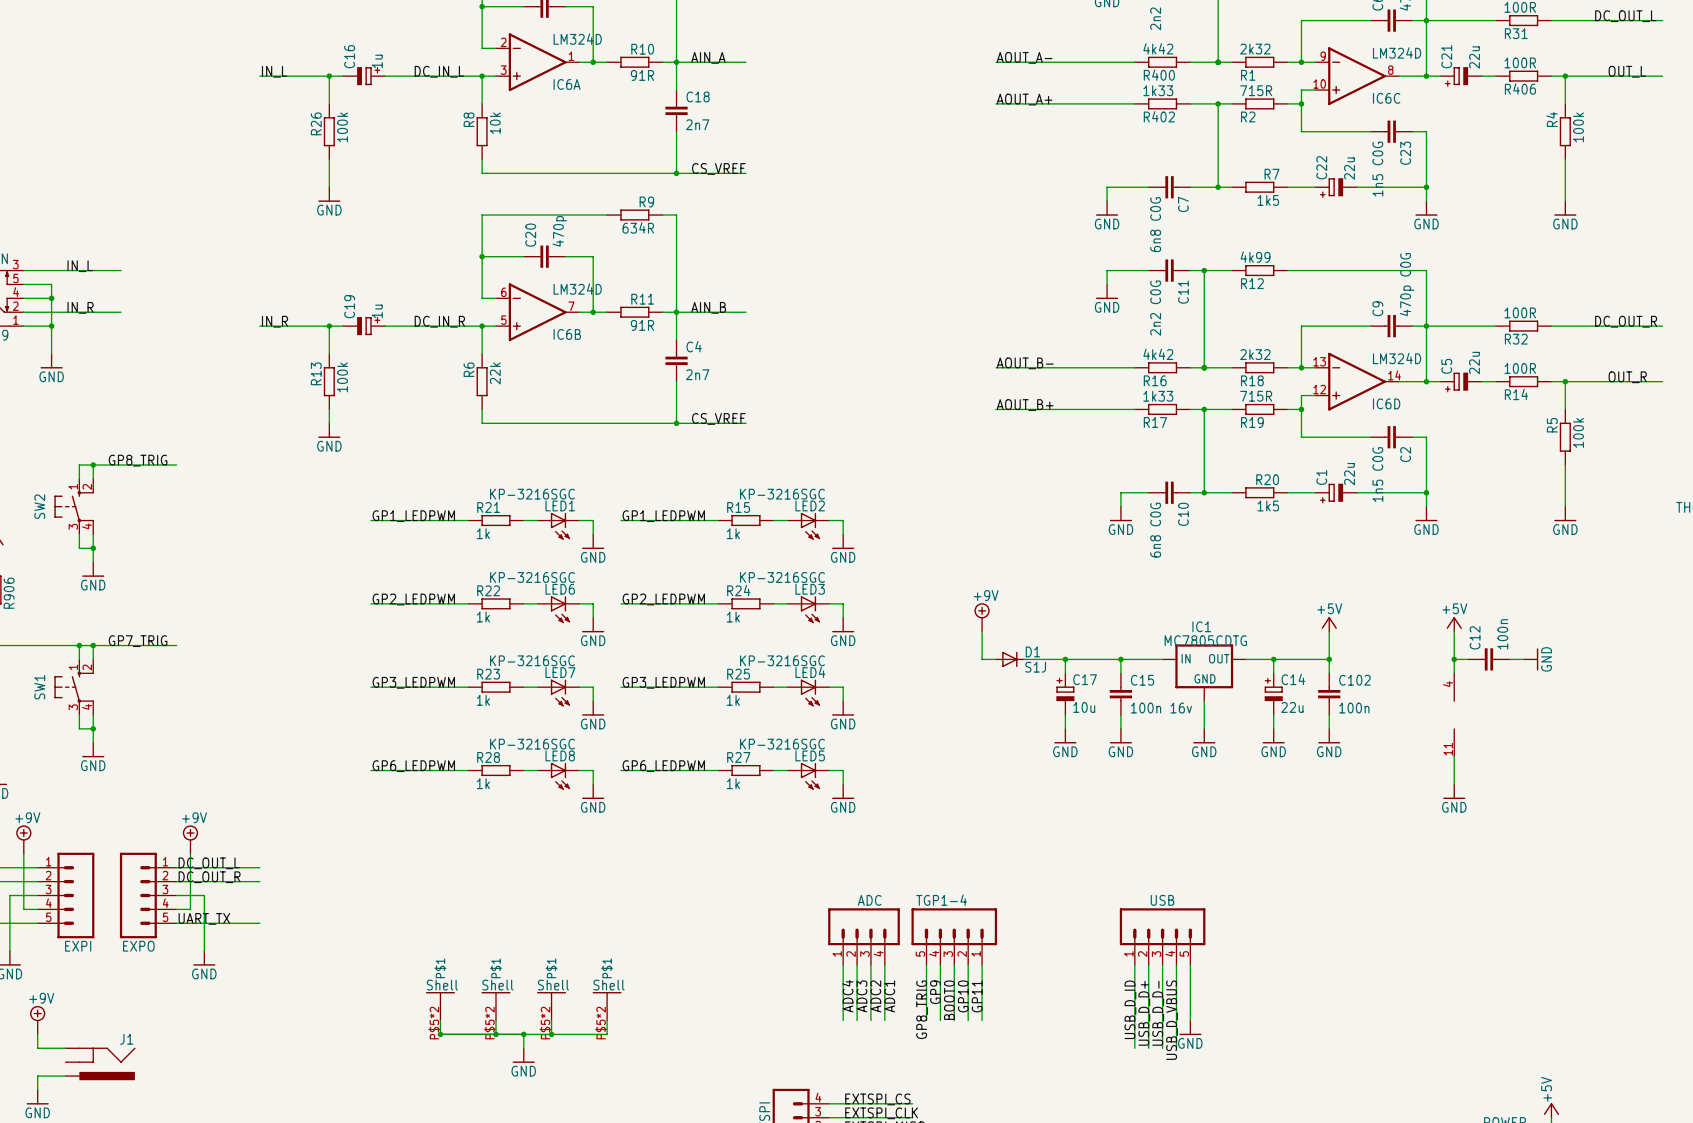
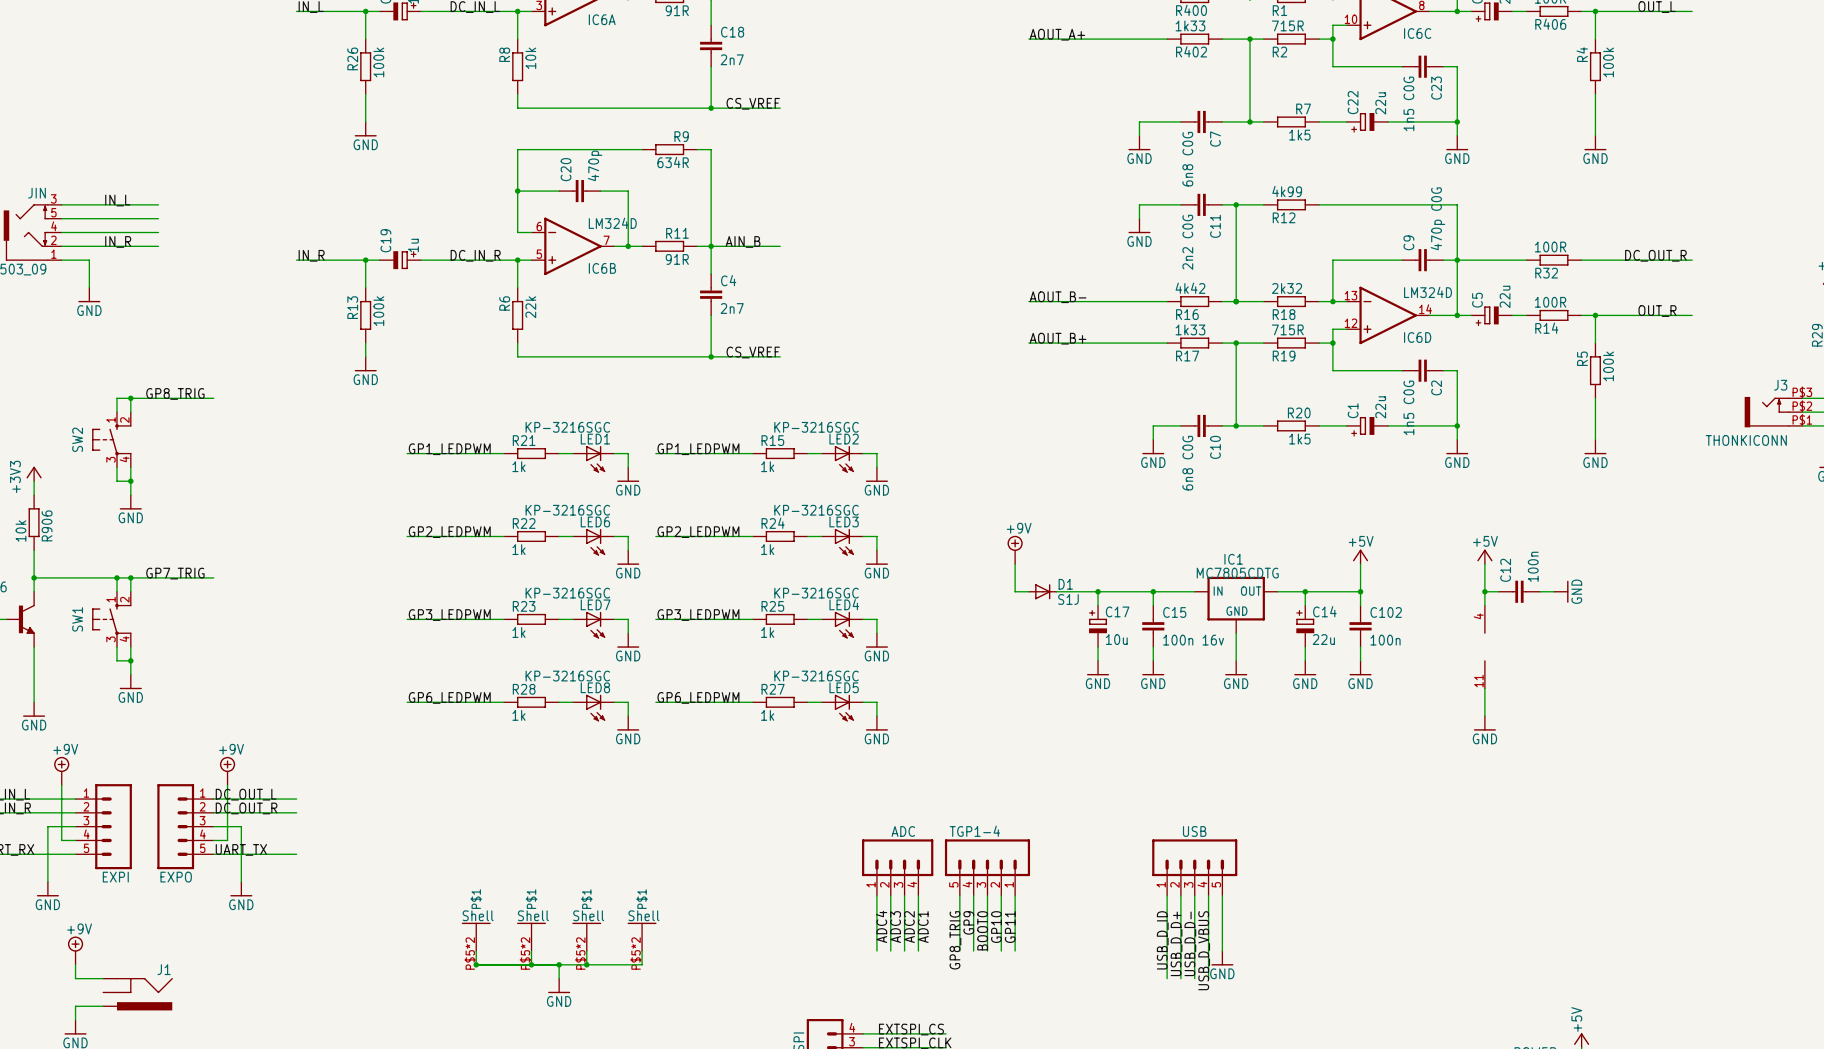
wire: (51, 284) (51, 326) -> (89, 218) (158, 218)
wire: none -> (89, 232) (158, 232)
junction: (51, 298) -> none
junction: (51, 326) -> none

